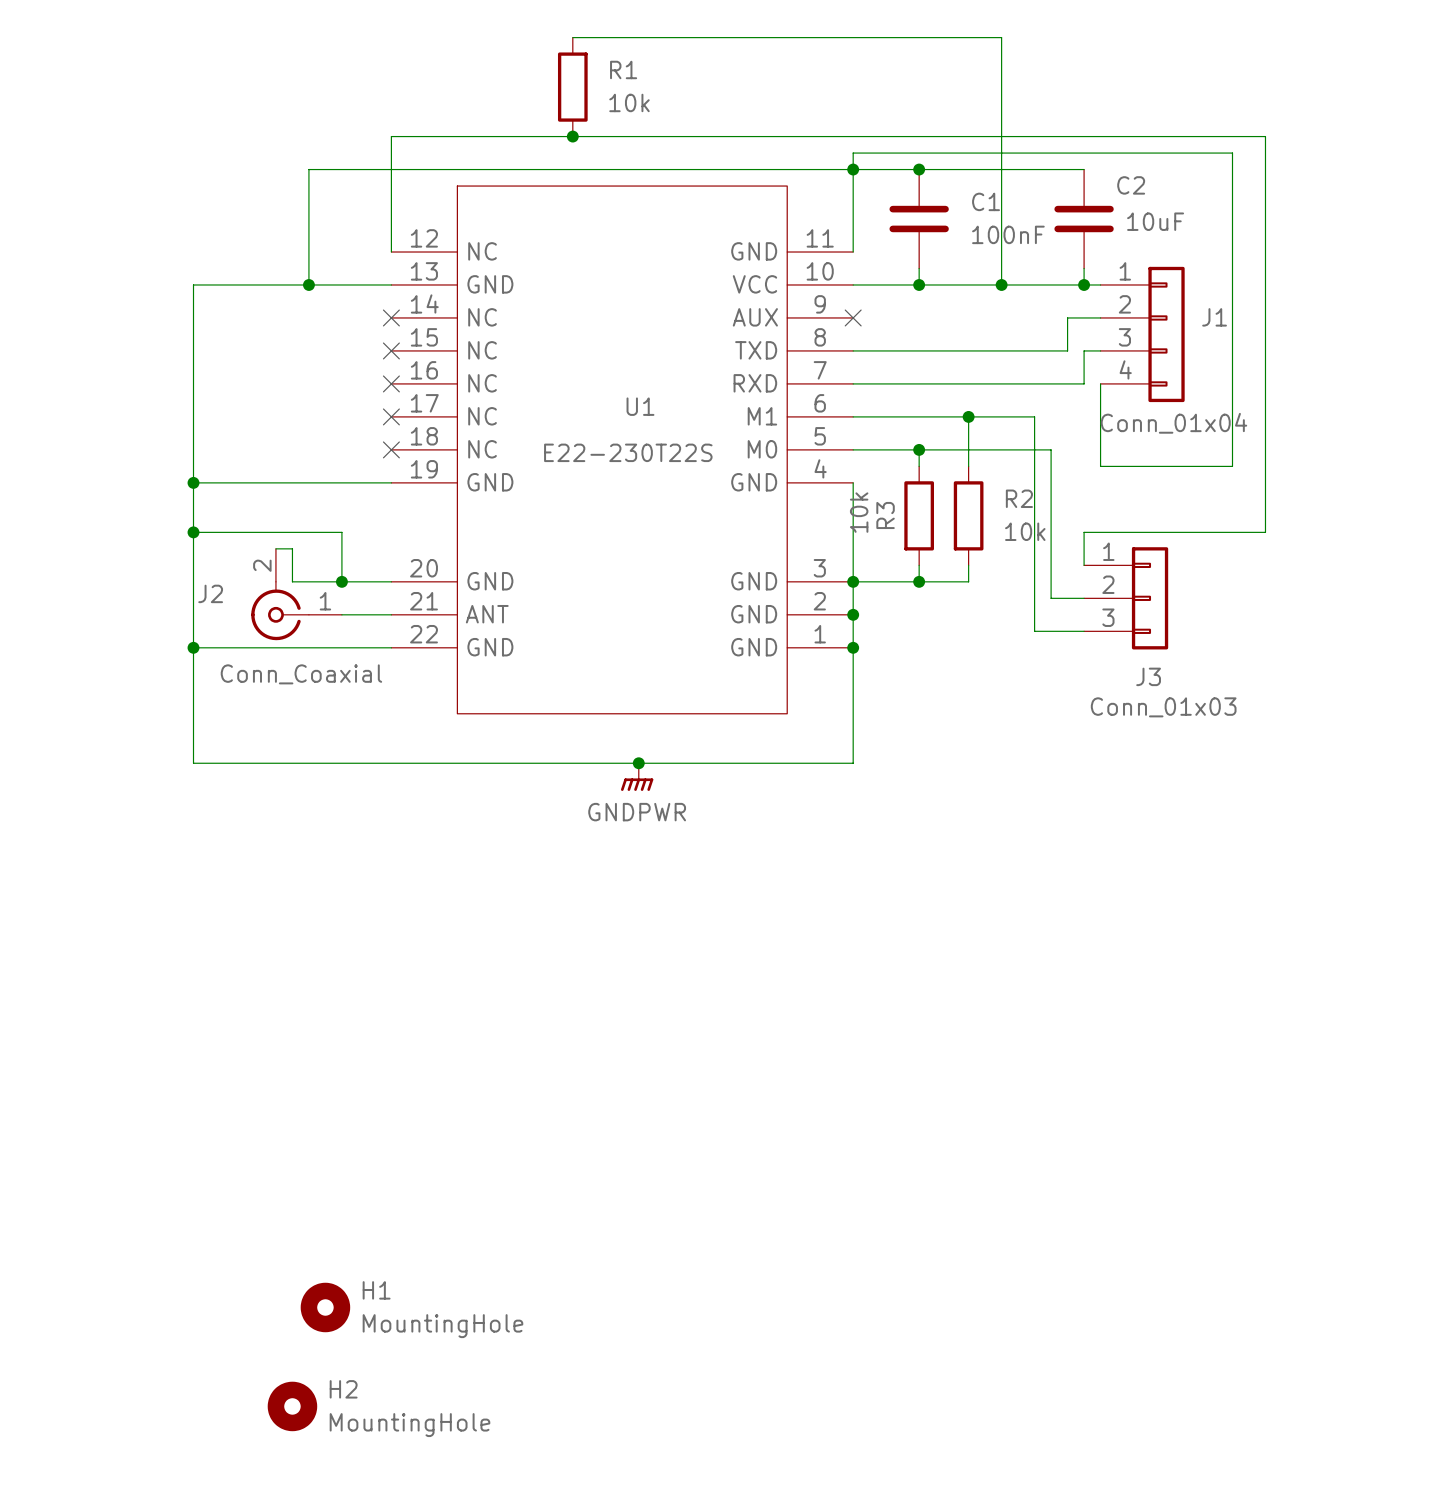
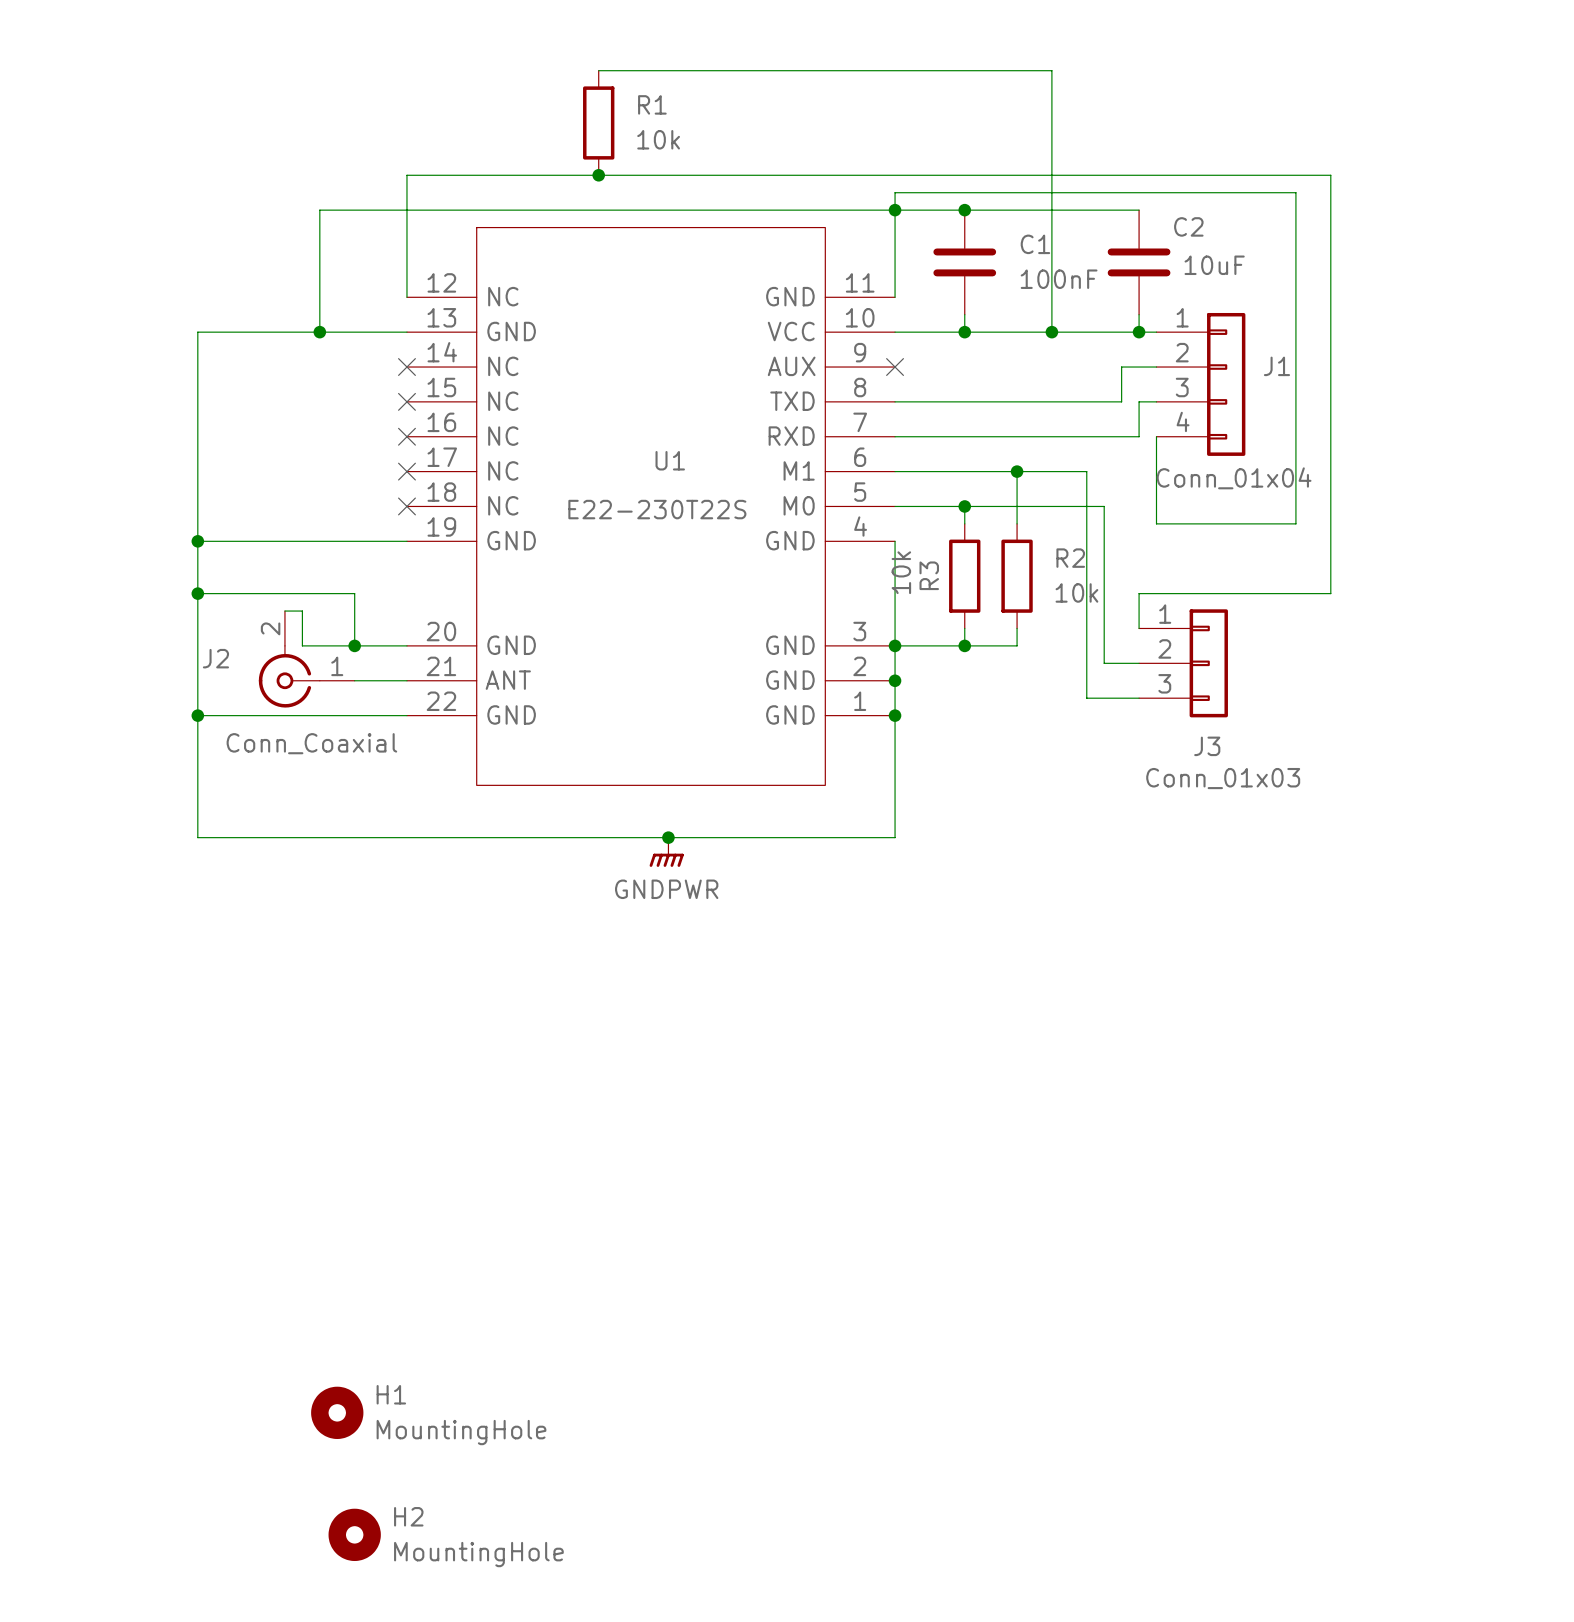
H2 position: (292, 1406) -> (354, 1534)

